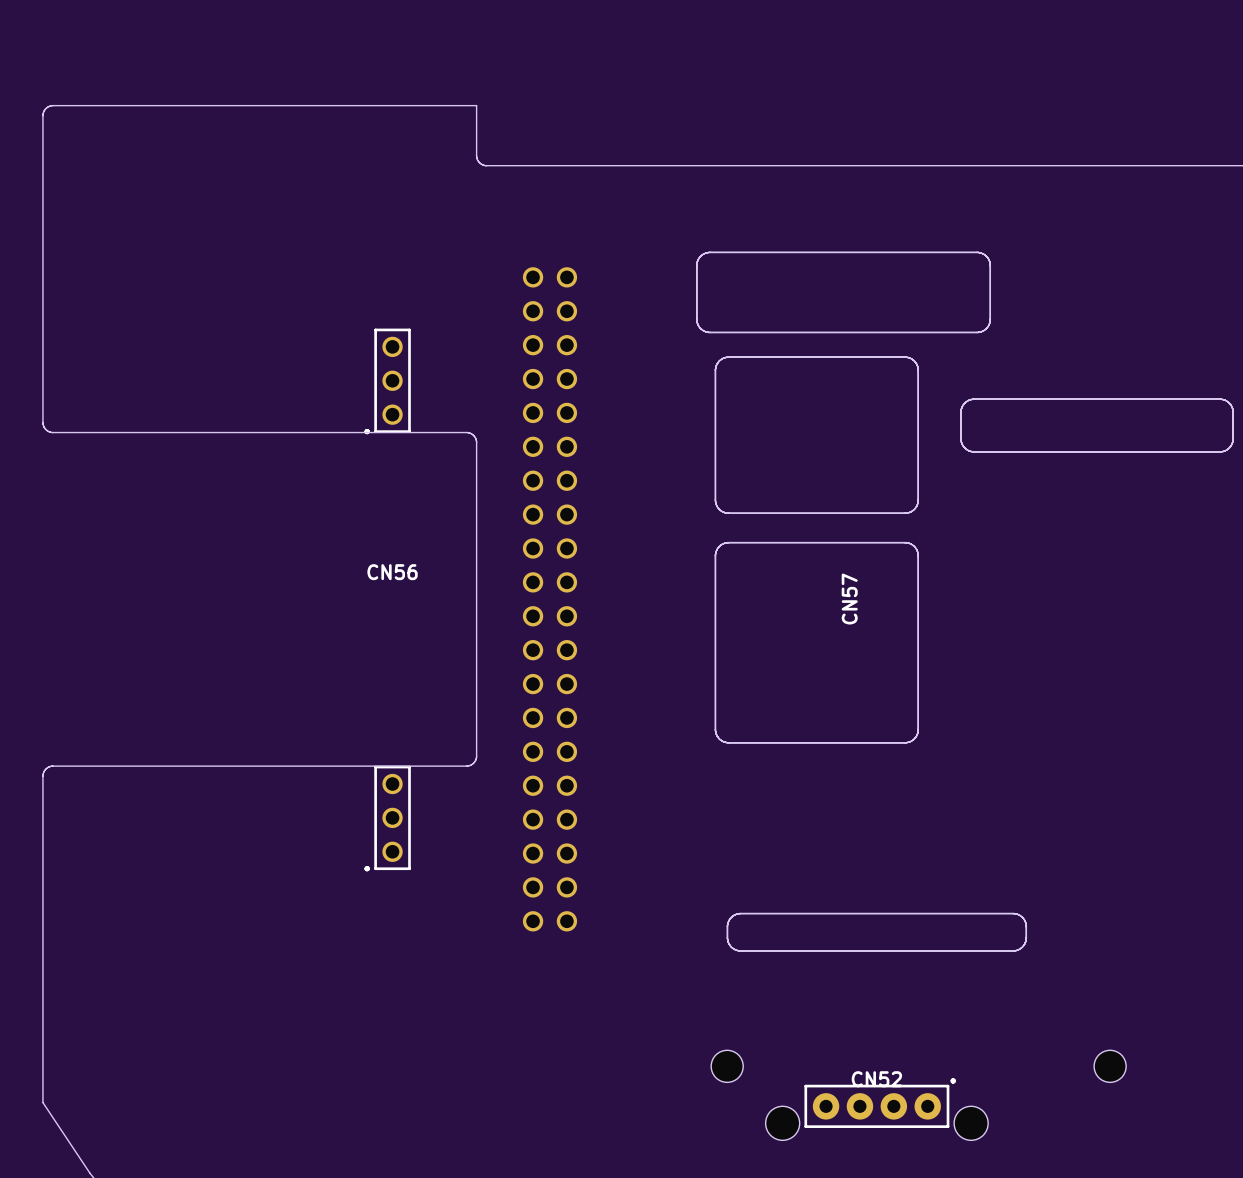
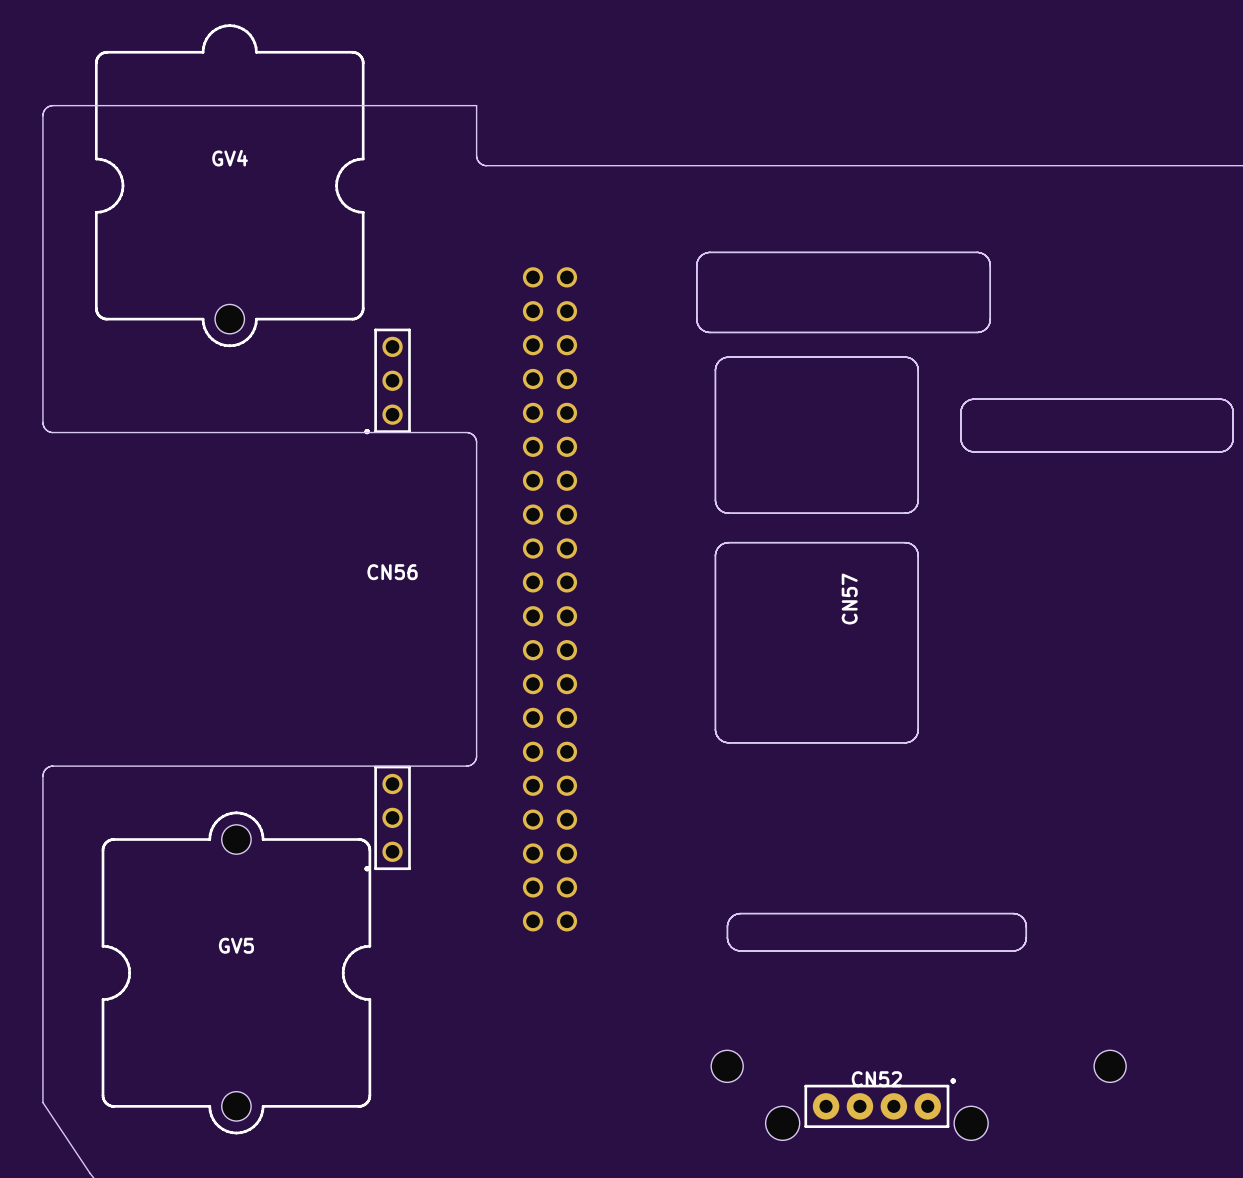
GV4: none -> (229, 185)
GV5: none -> (236, 972)

